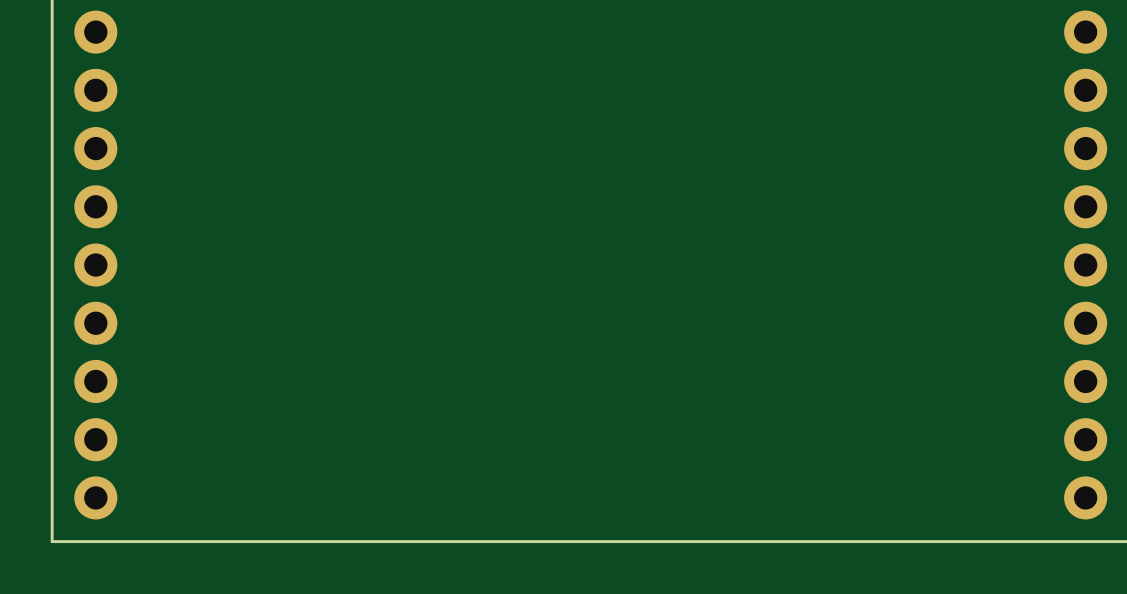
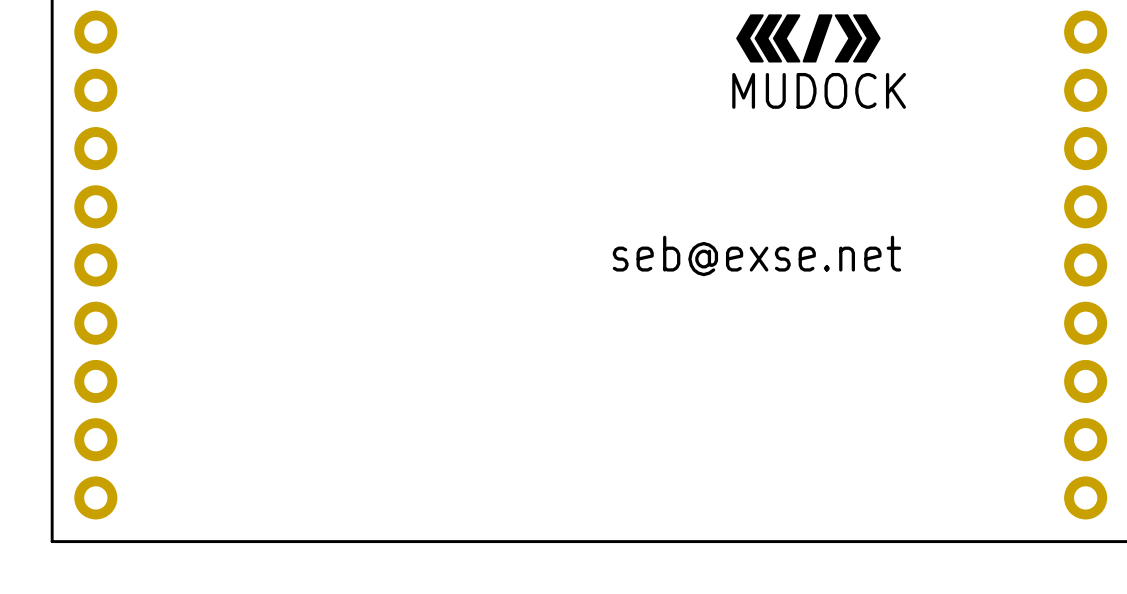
drawing: none -> [736, 14, 881, 63]
text: none -> MUDOCK (819, 90)
text: none -> seb@exse.net (756, 255)

